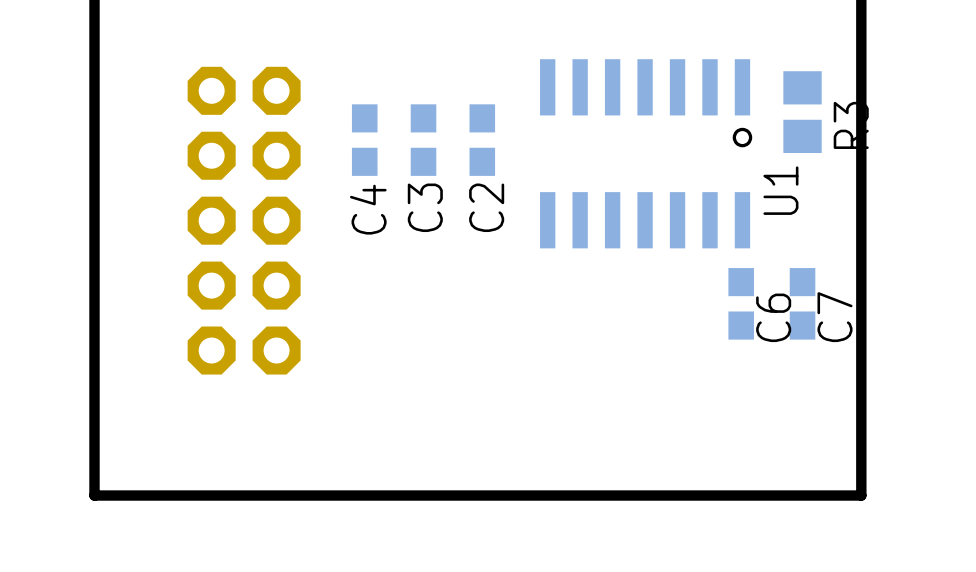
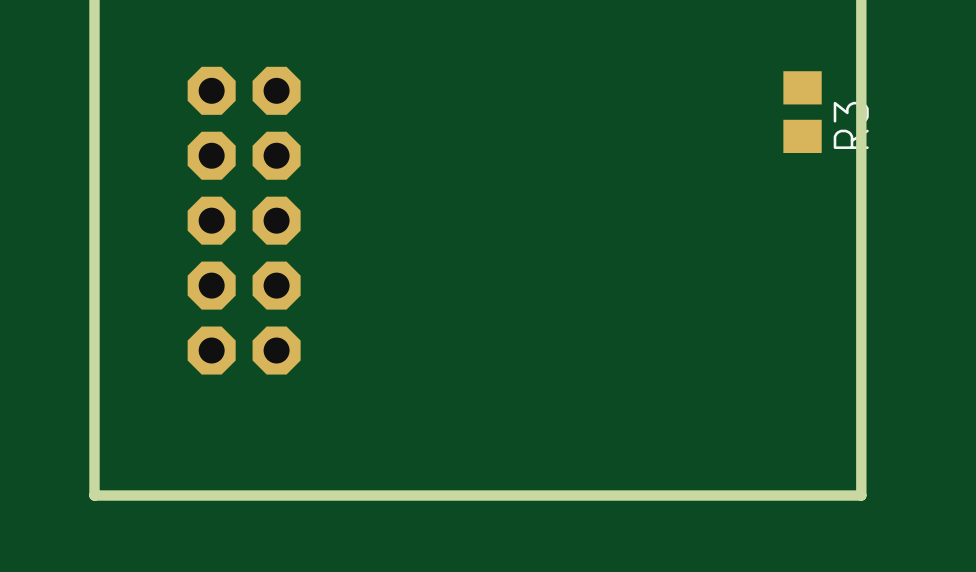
C4: (364, 140) -> none
C3: (423, 140) -> none
C2: (482, 140) -> none
U1: (646, 153) -> none
C6: (741, 303) -> none
C7: (802, 303) -> none

